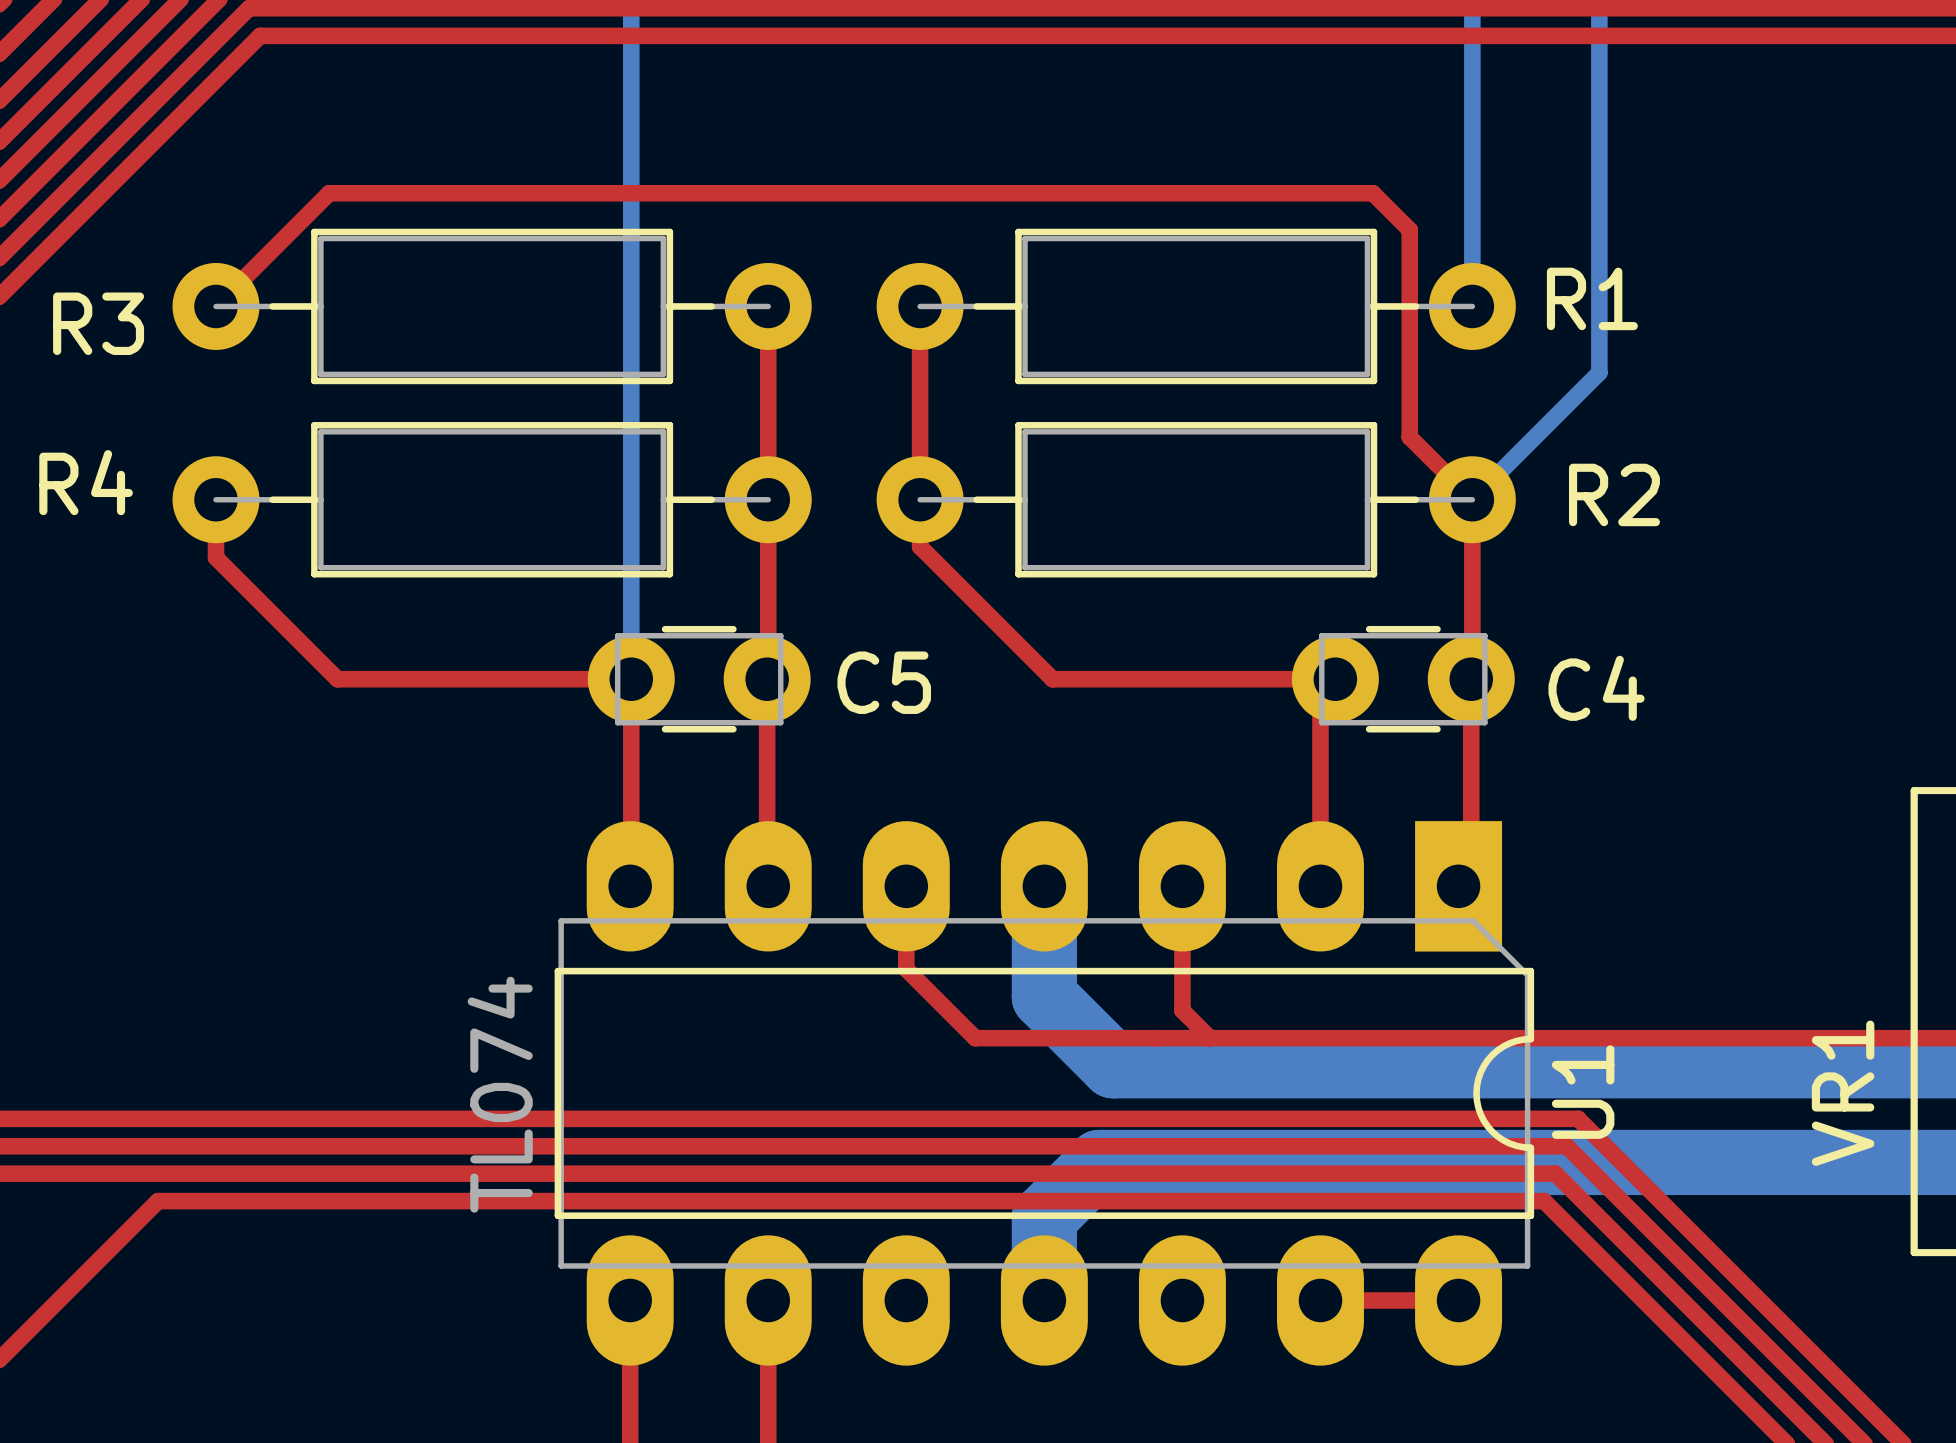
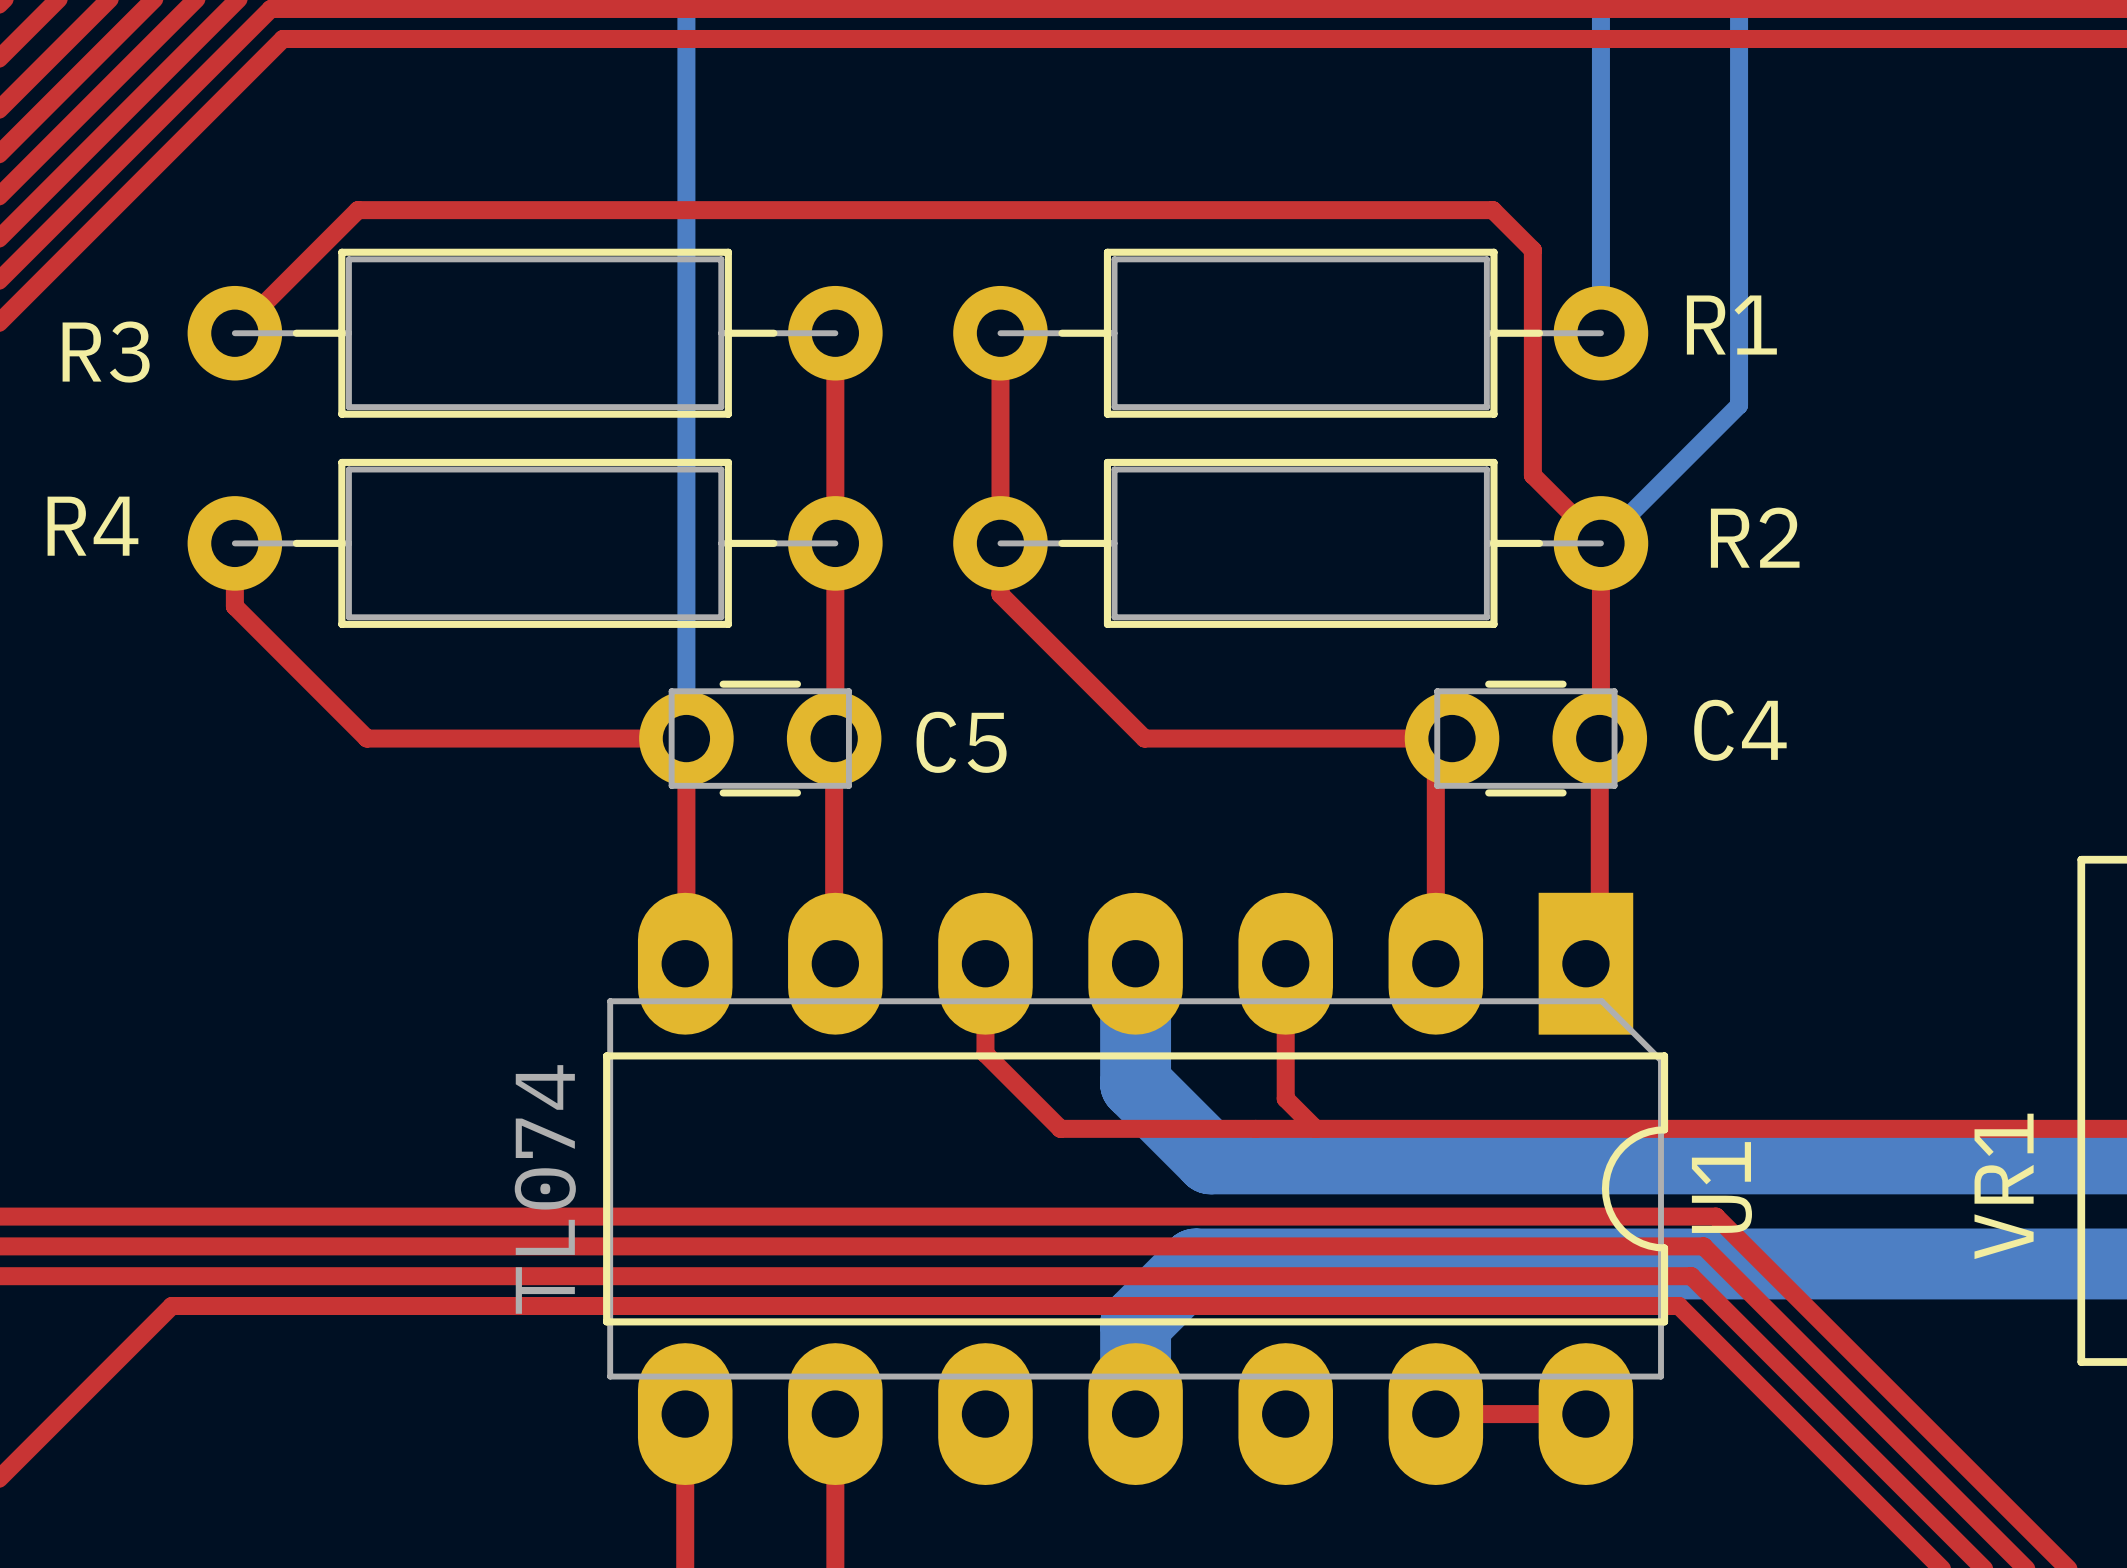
C4 name position: C4 (1596, 688) -> C4 (1740, 730)

